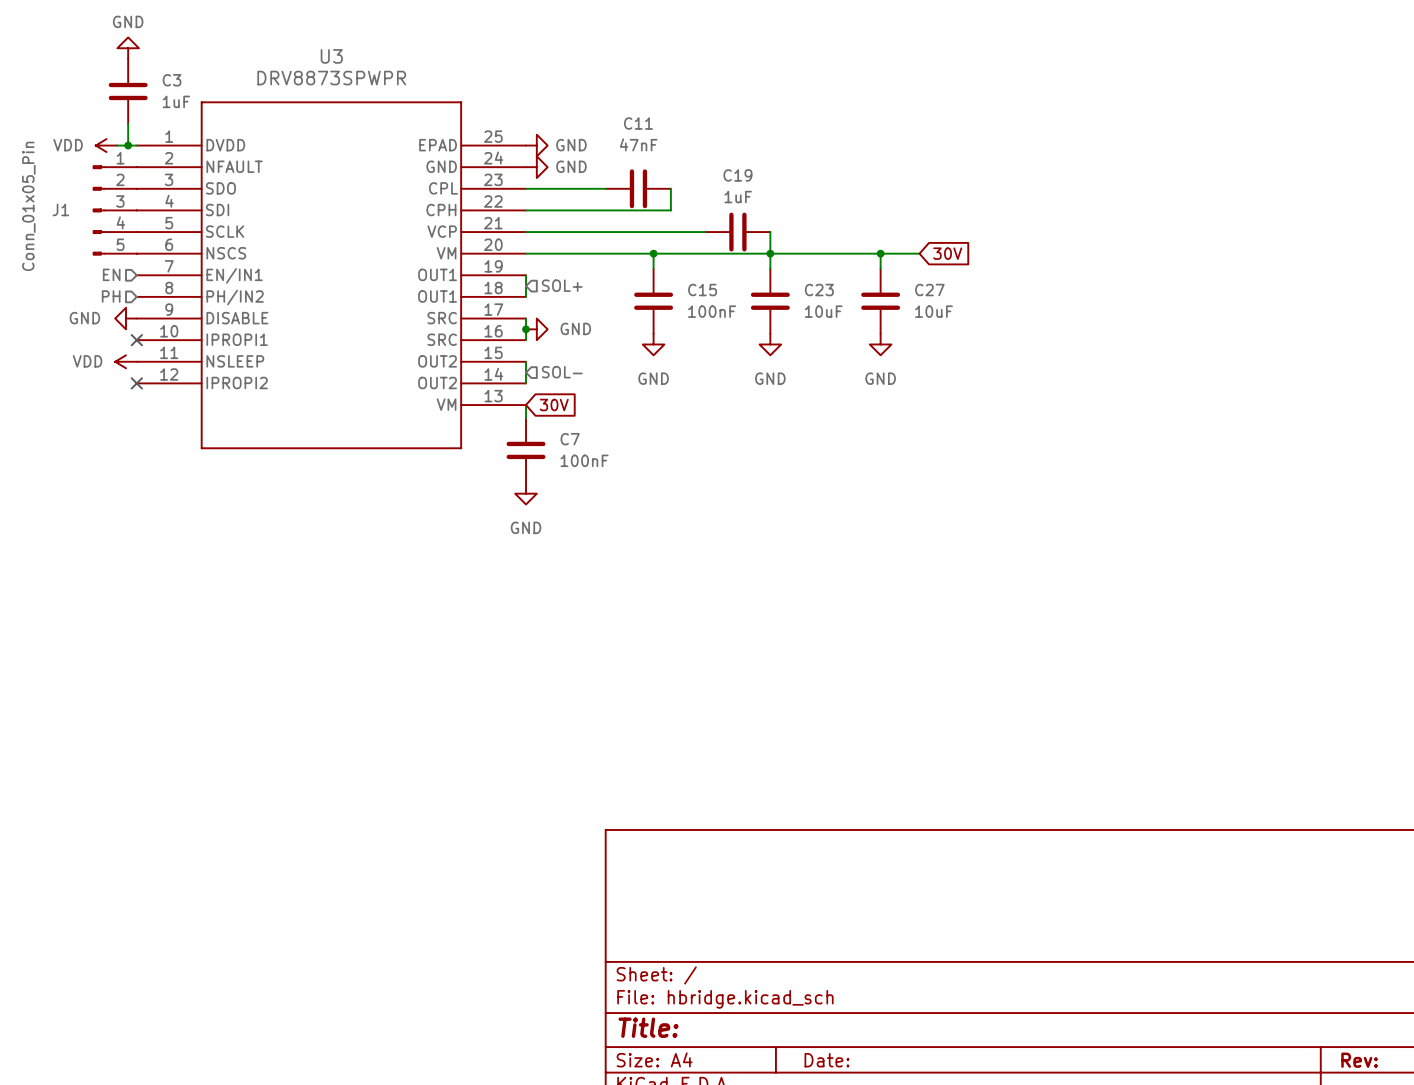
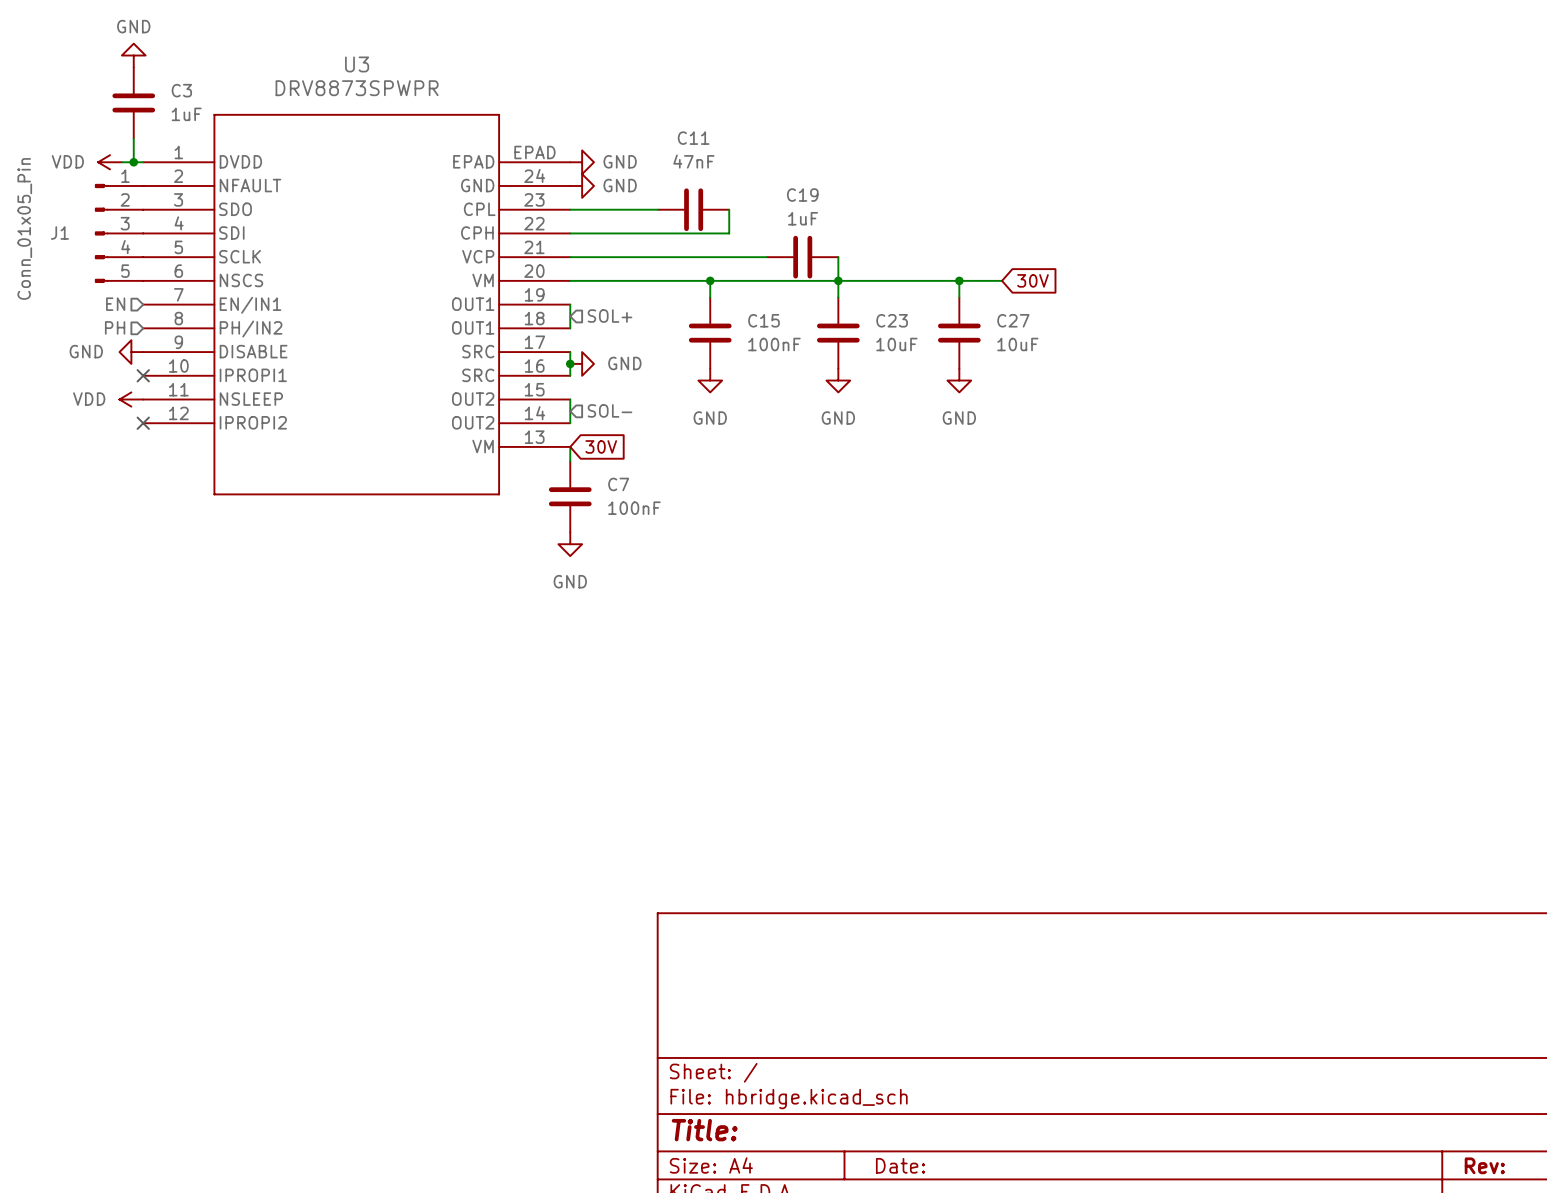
U3 pin number: 25 (493, 136) -> EPAD (534, 152)

